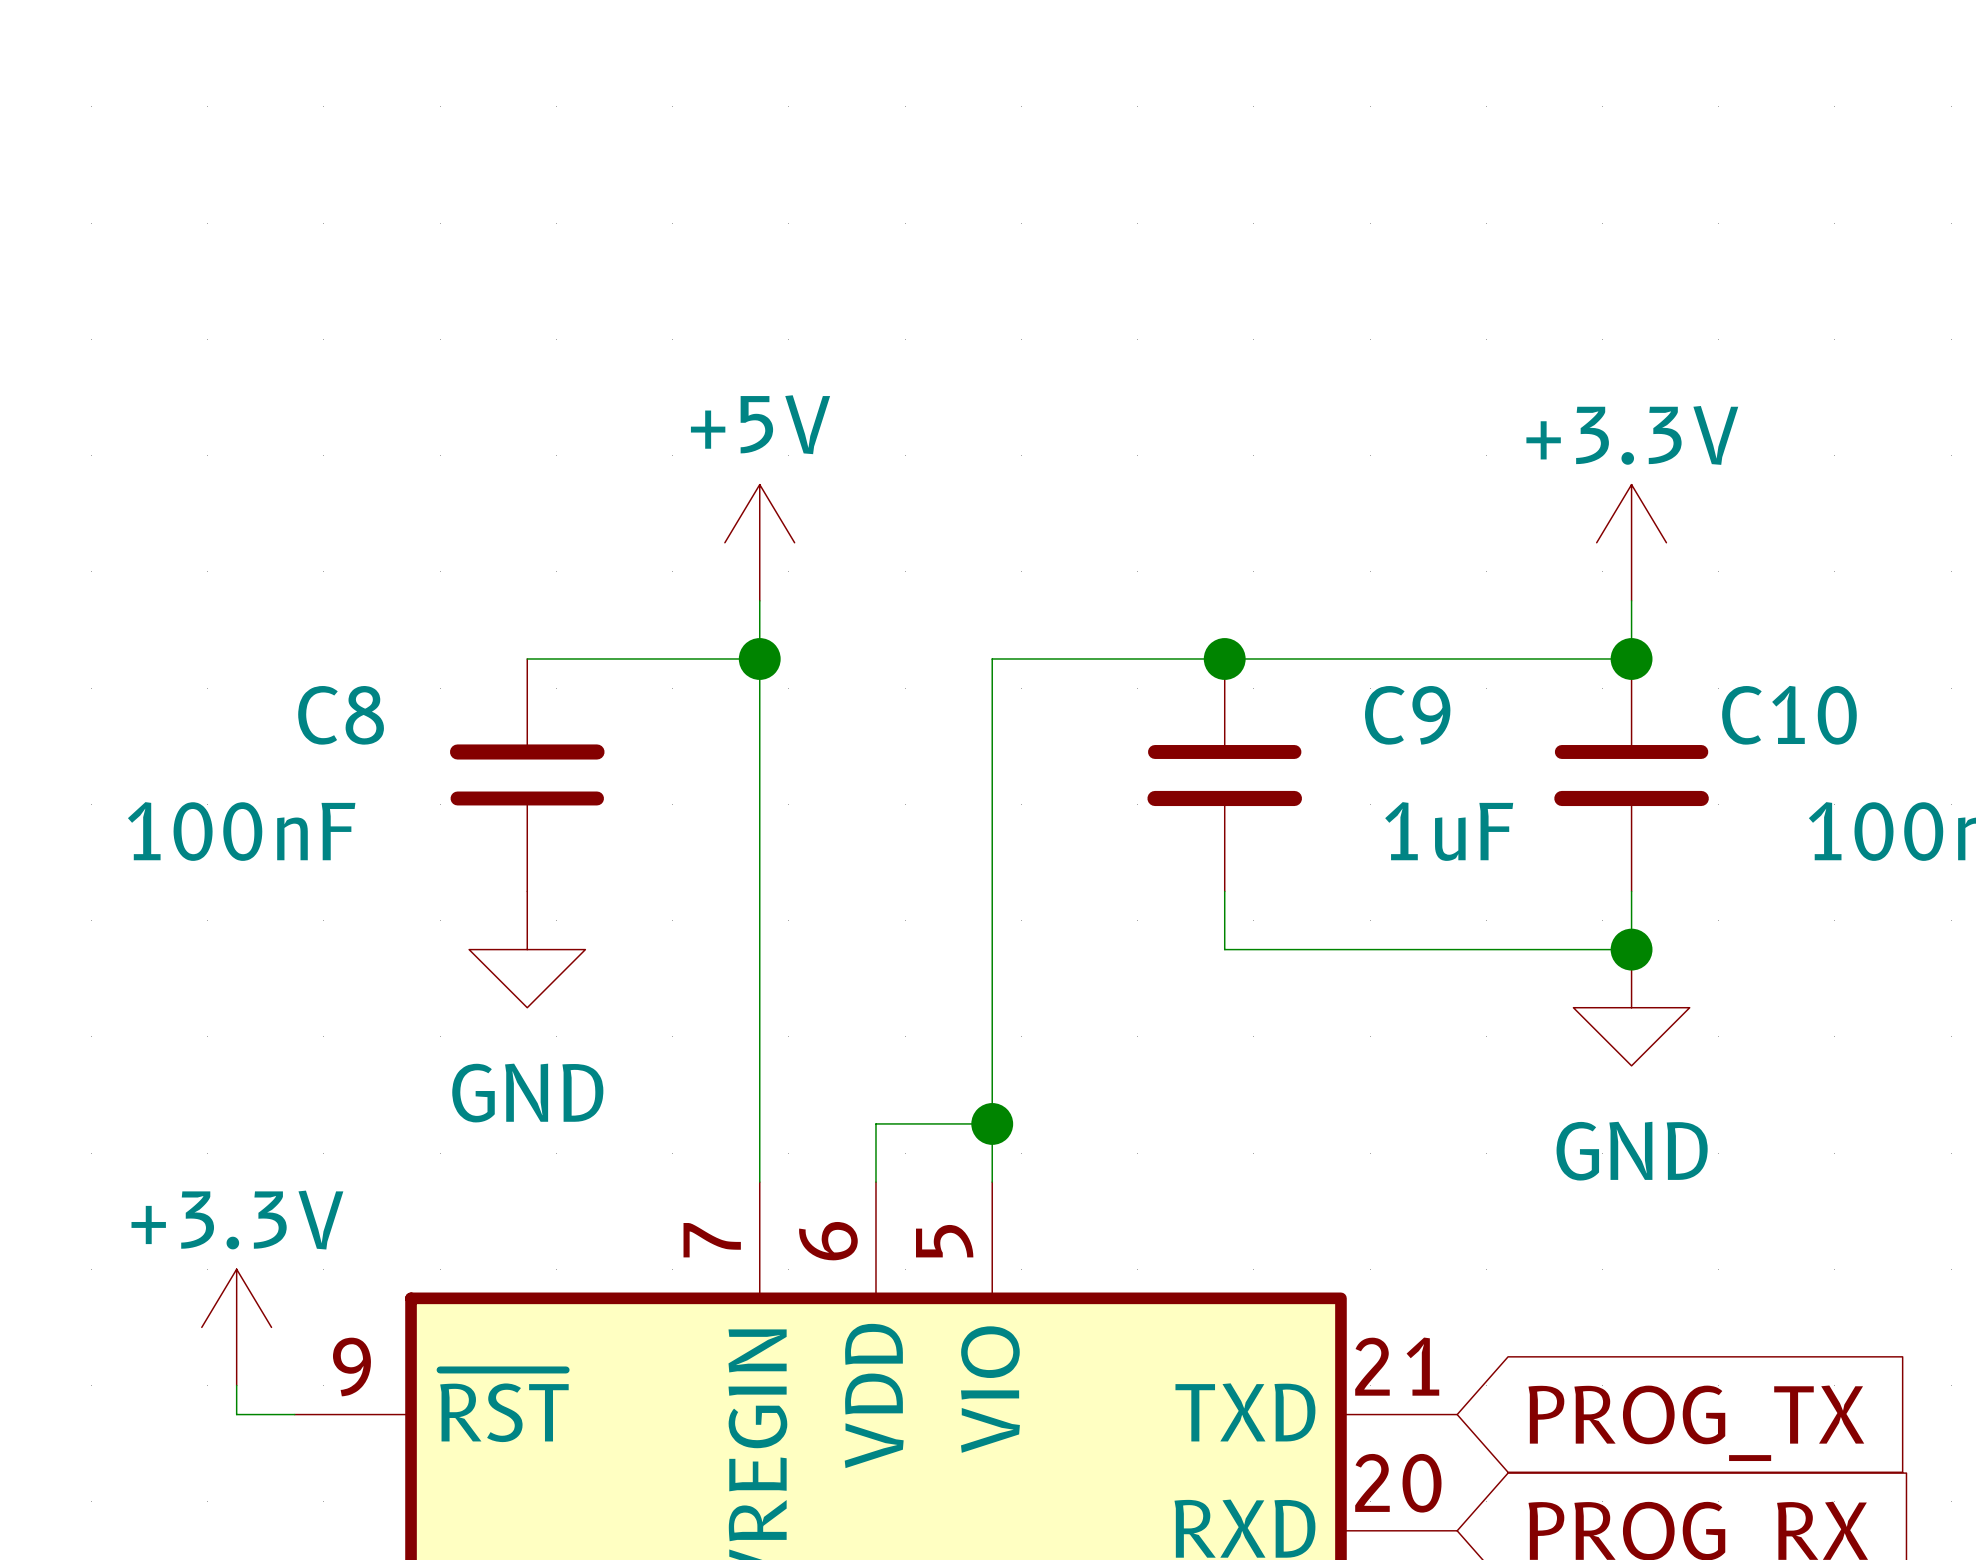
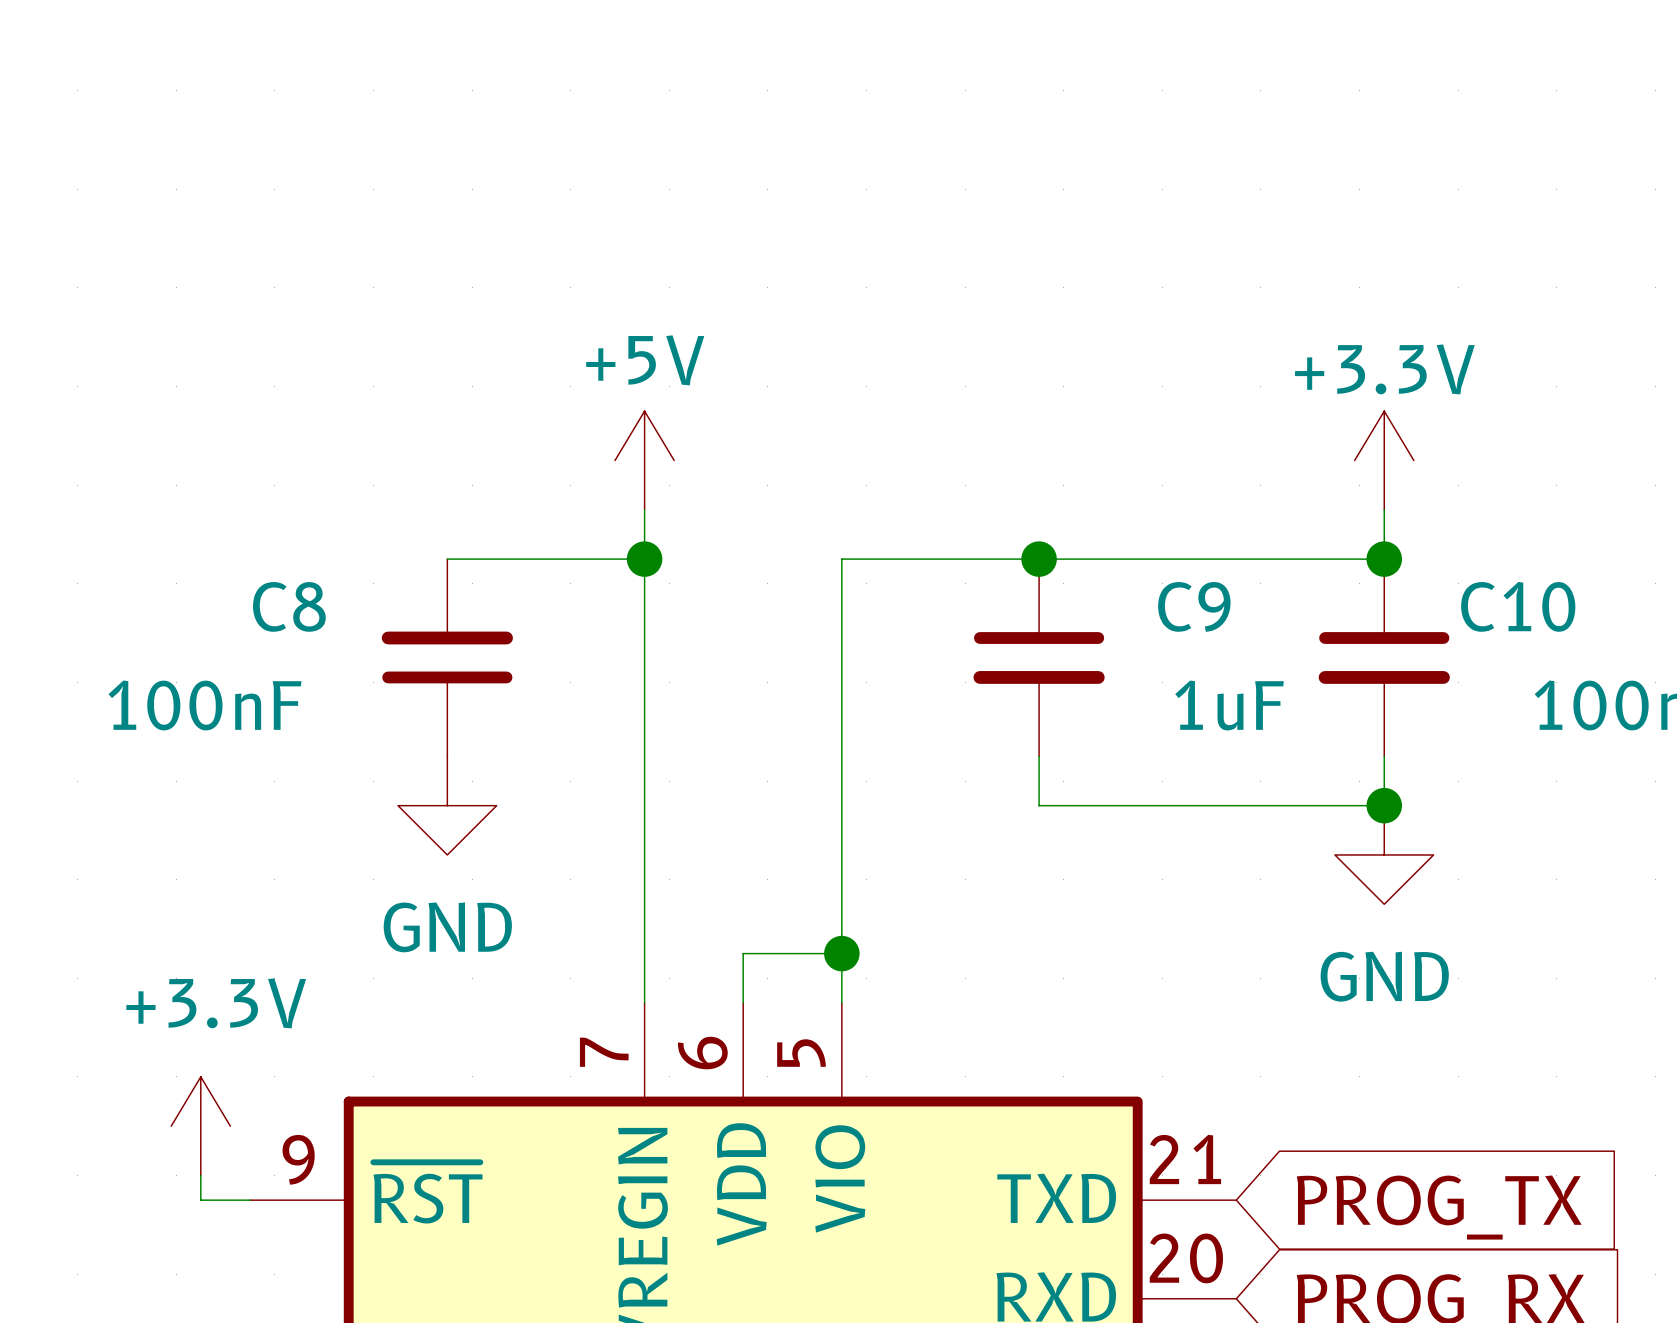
power symbol text position: +3.3V (237, 1220) -> +3.3V (216, 1003)

